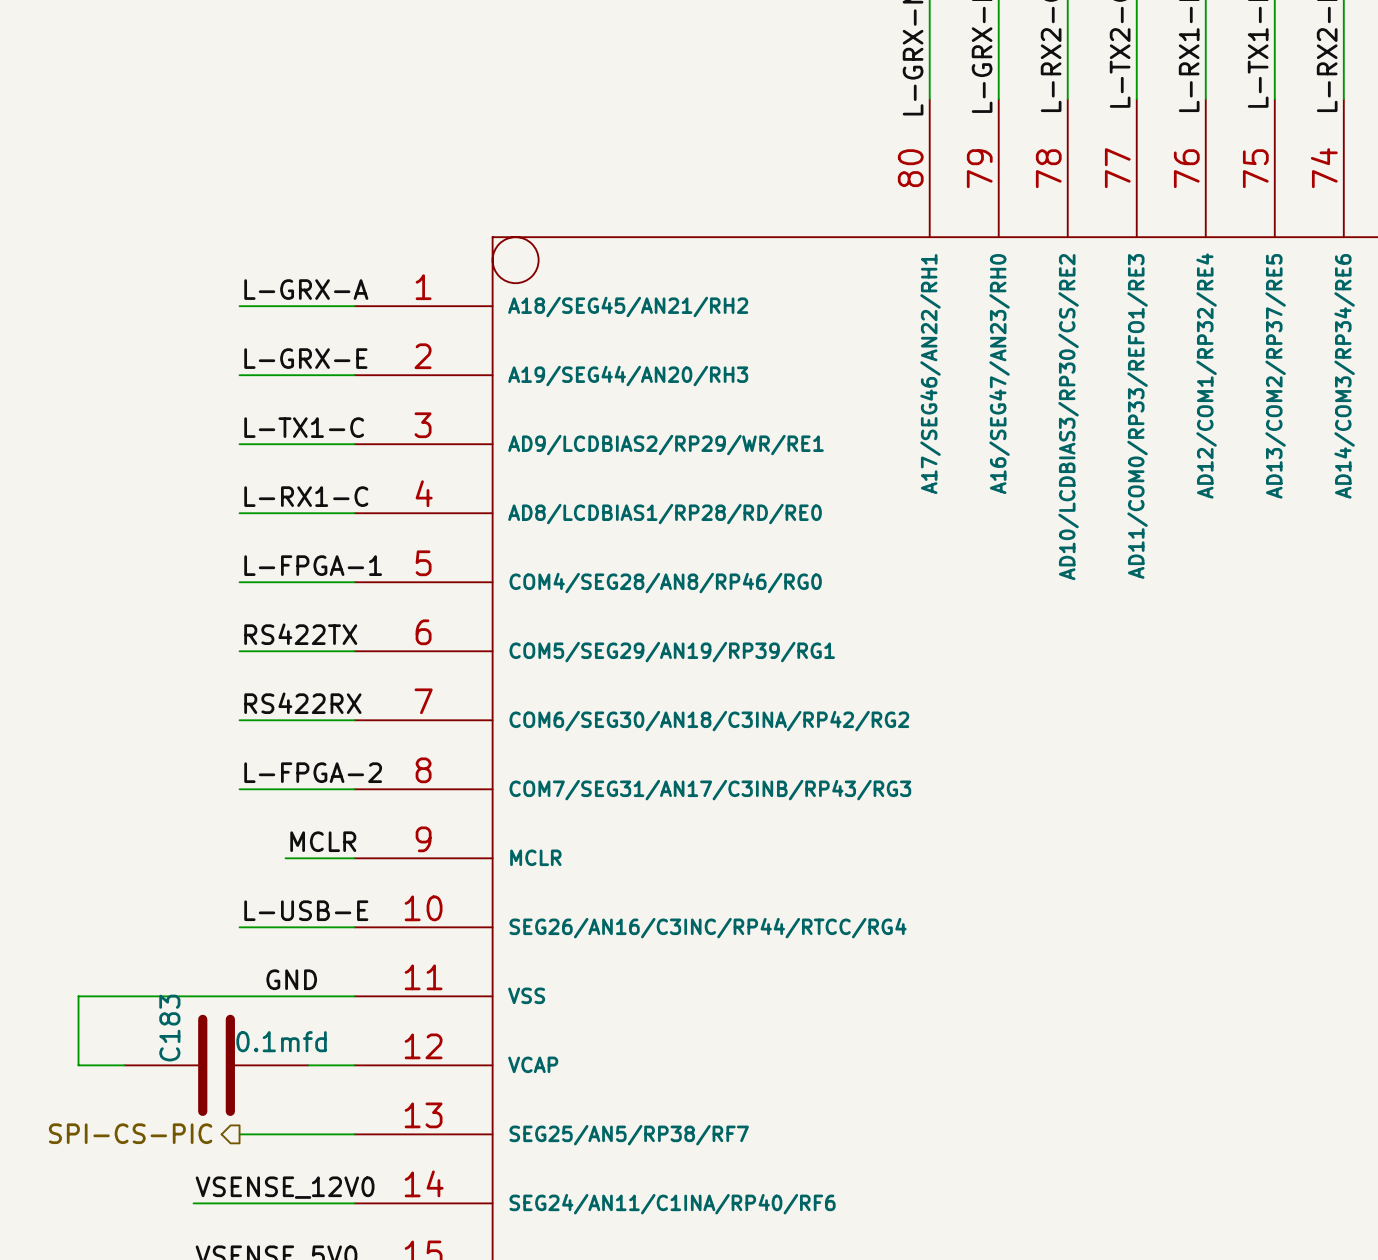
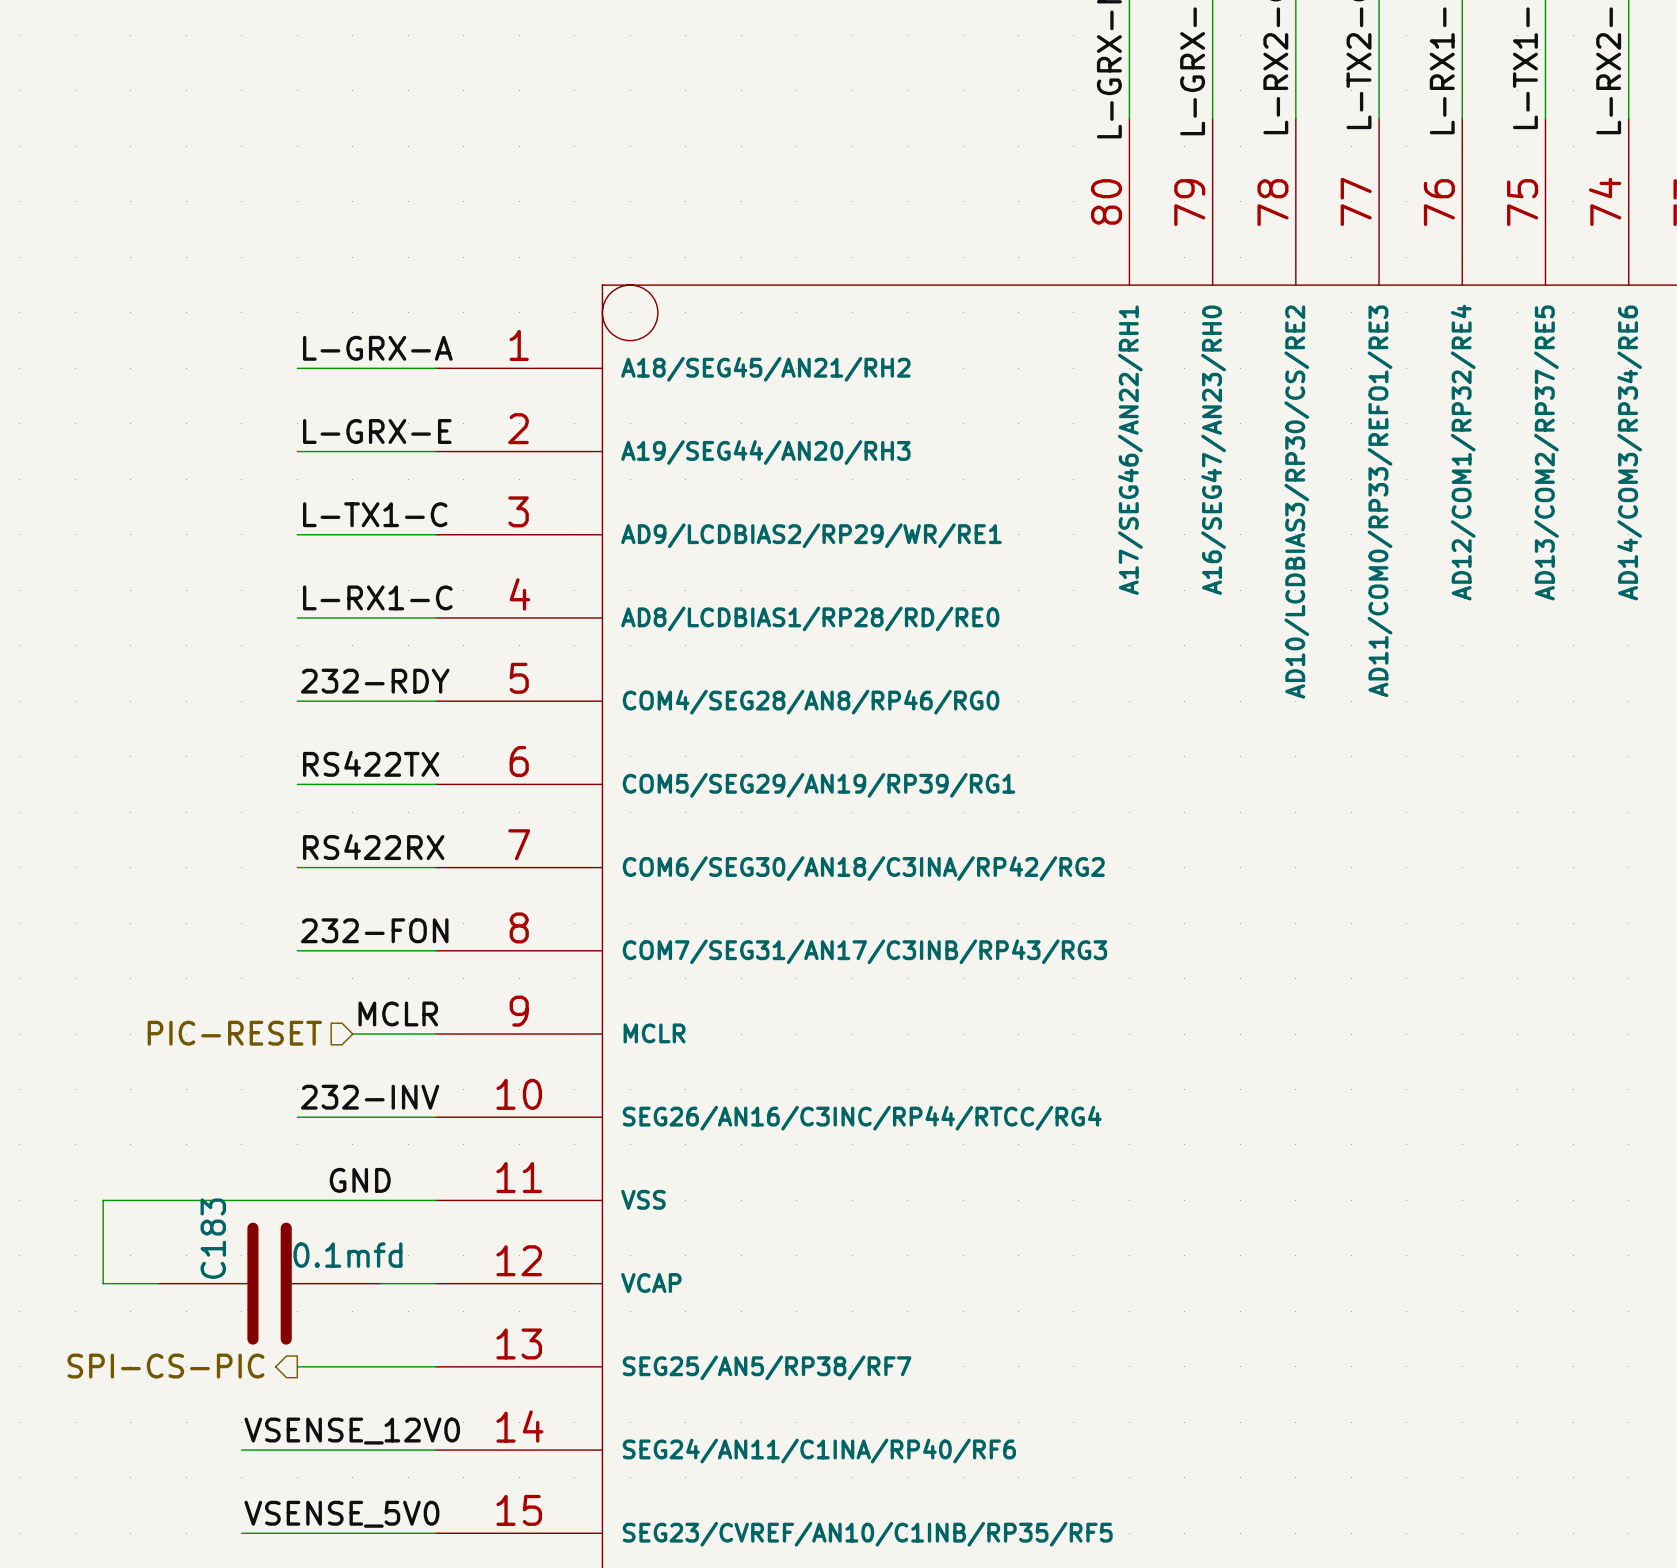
label: L-FPGA-1 (313, 565) -> 232-RDY (375, 681)
label: L-FPGA-2 (313, 772) -> 232-FON (374, 930)
hierarchical label: none -> PIC-RESET (234, 1033)
label: L-USB-E (306, 910) -> 232-INV (370, 1097)

